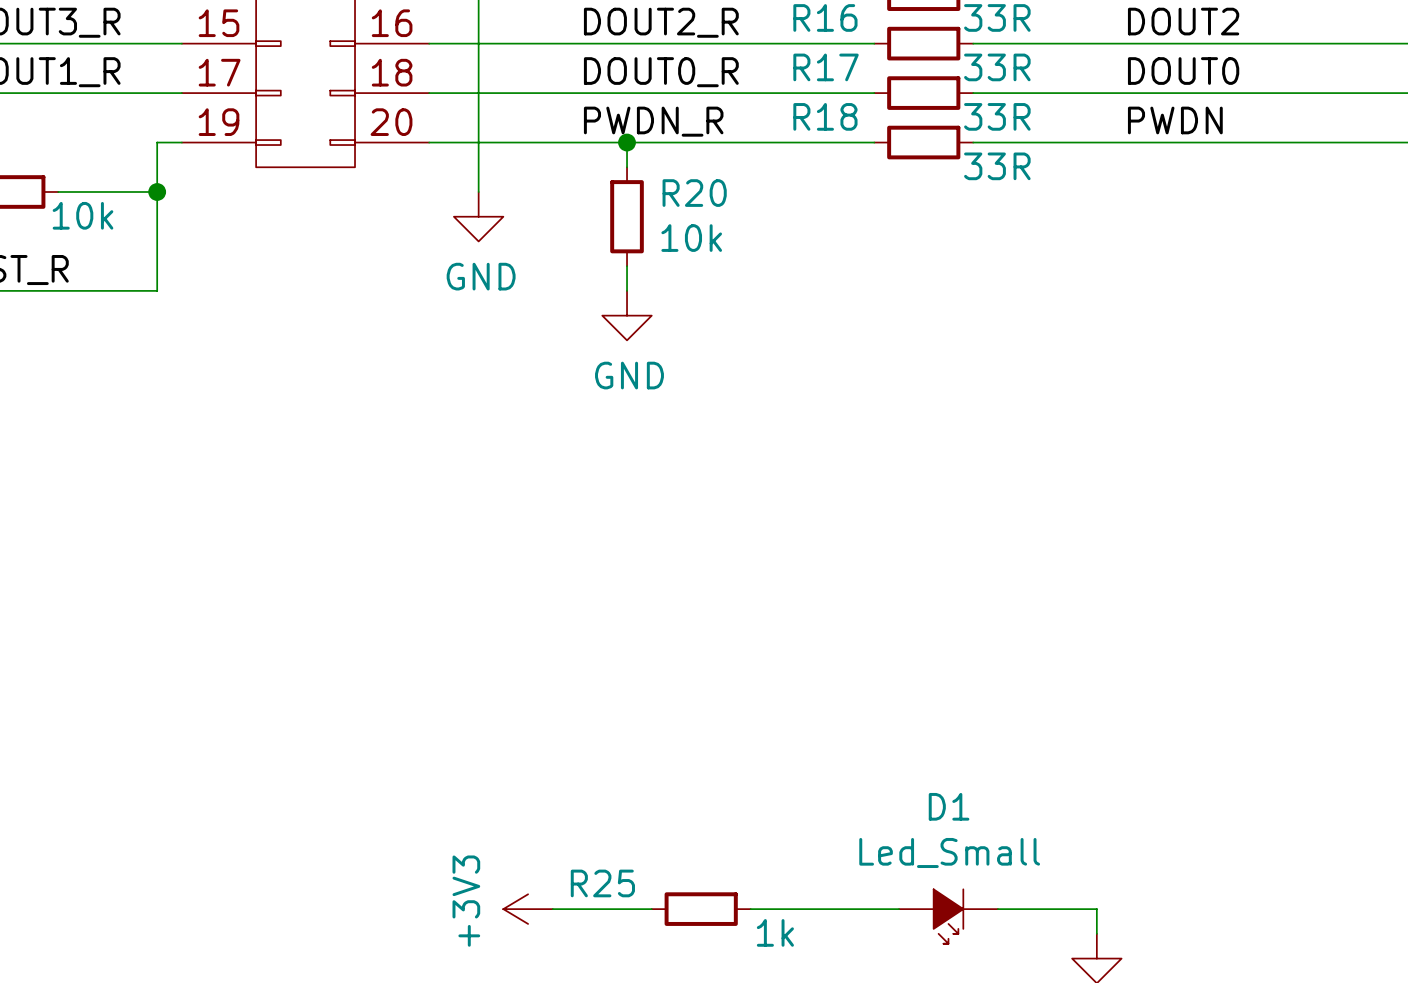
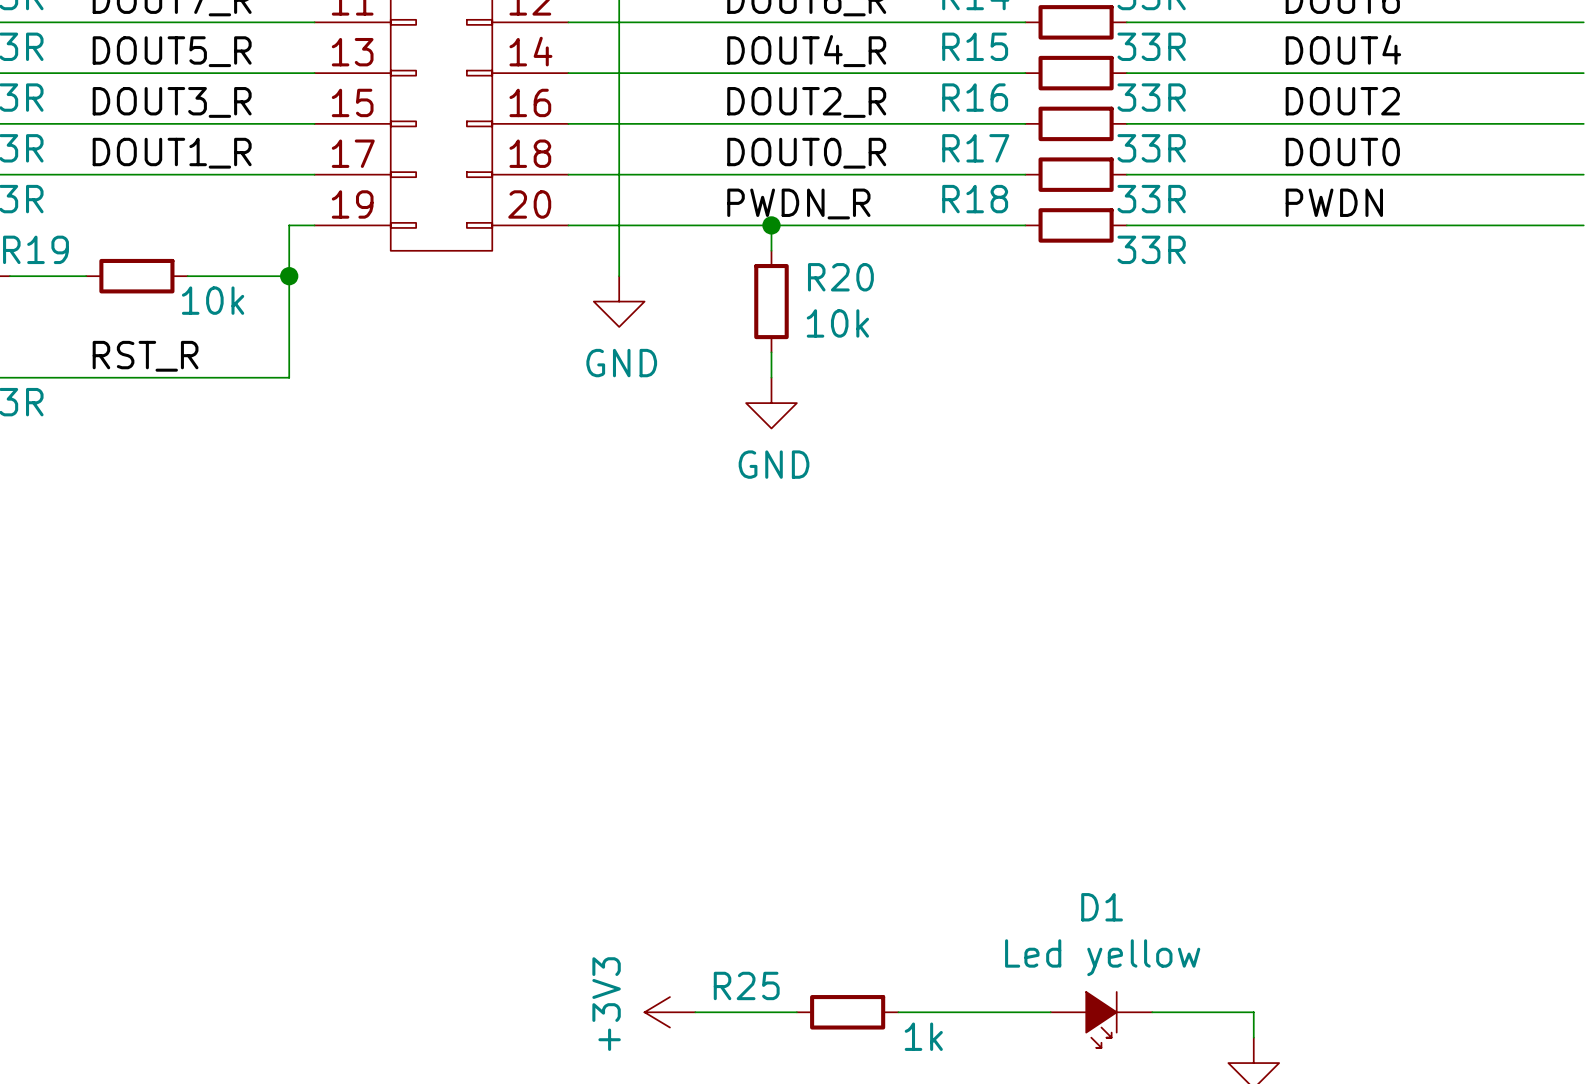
D1 value: Led_Small (949, 852) -> Led yellow (1102, 957)

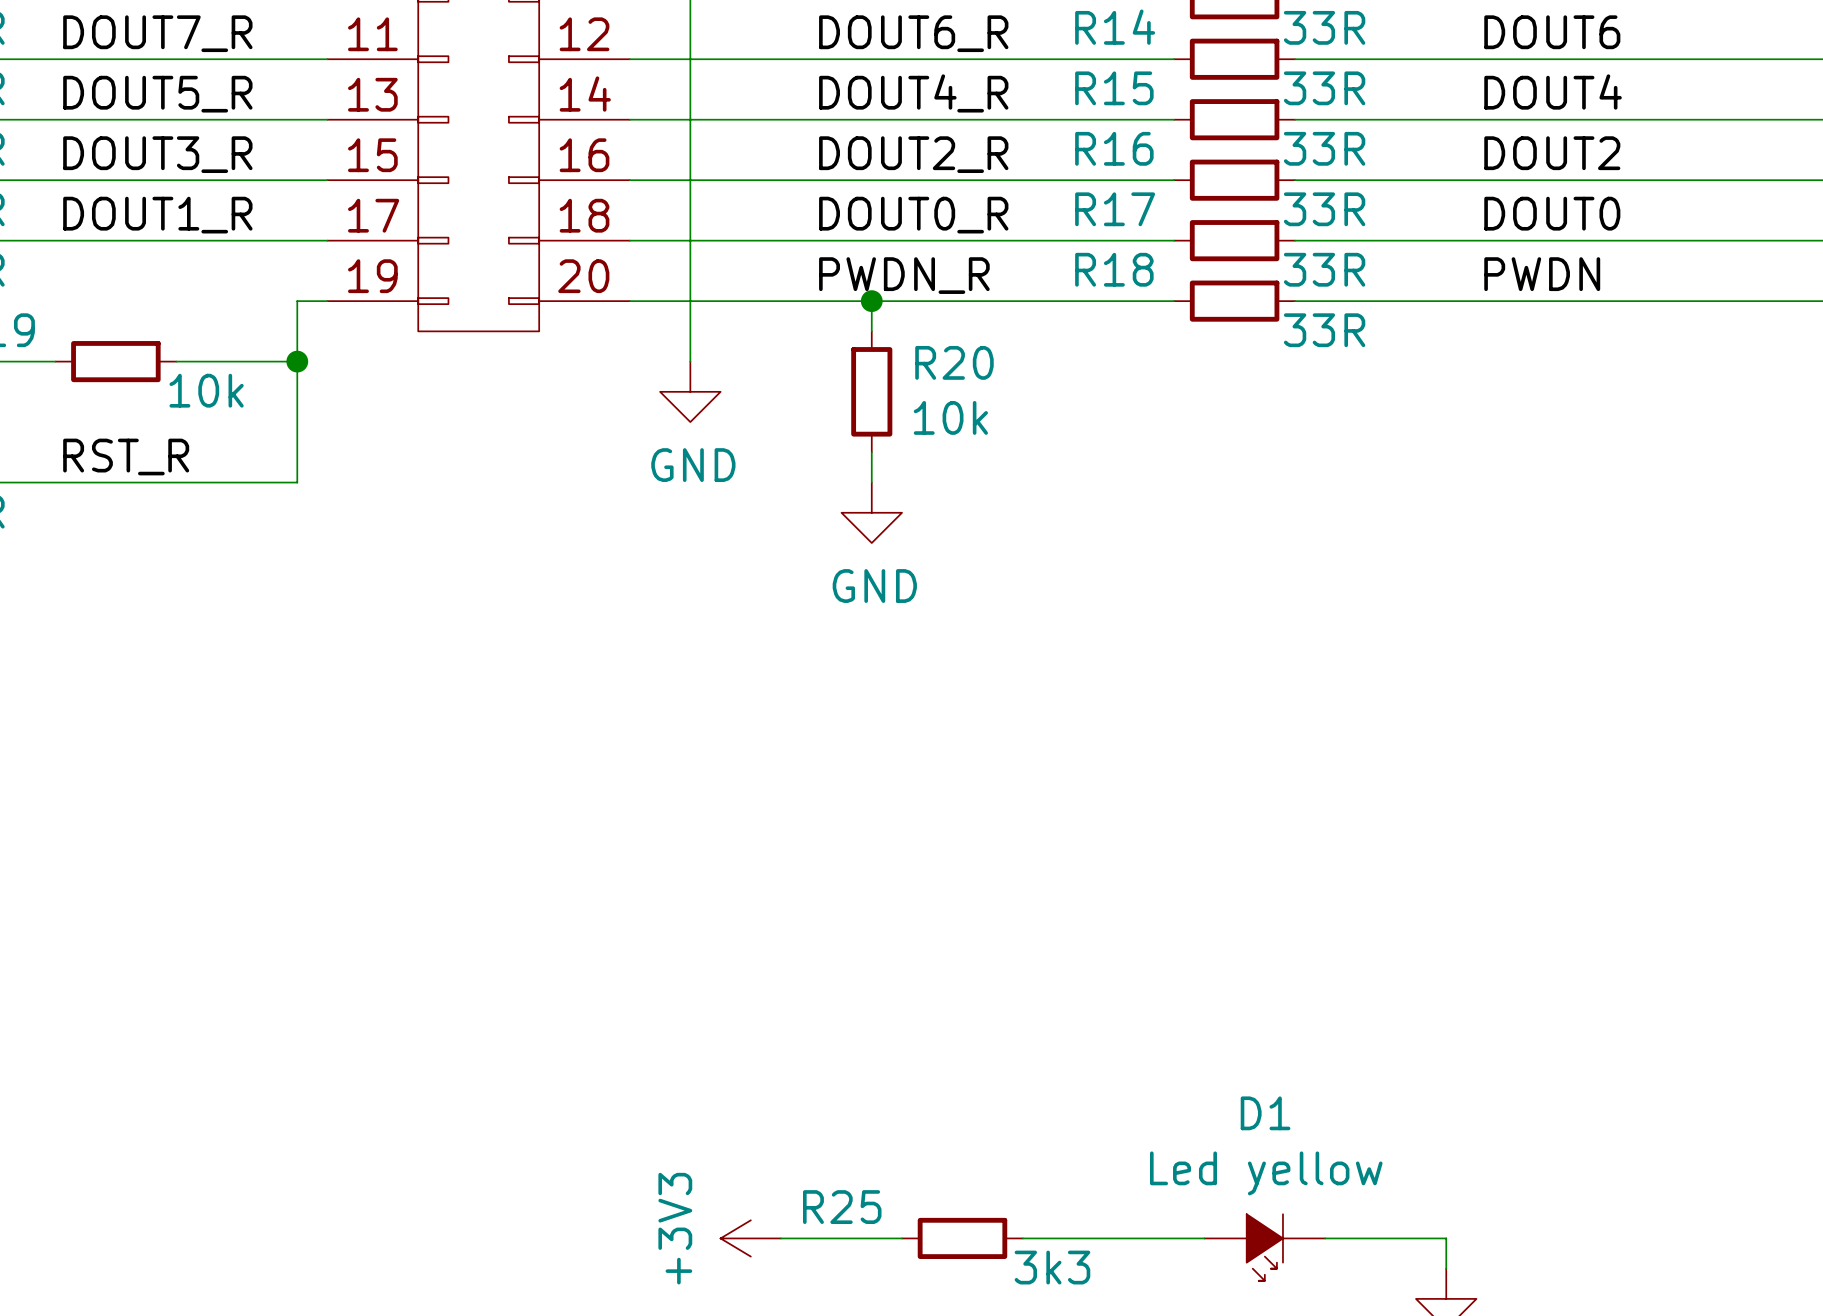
R25 value: 1k (923, 1036) -> 3k3 (1052, 1267)

